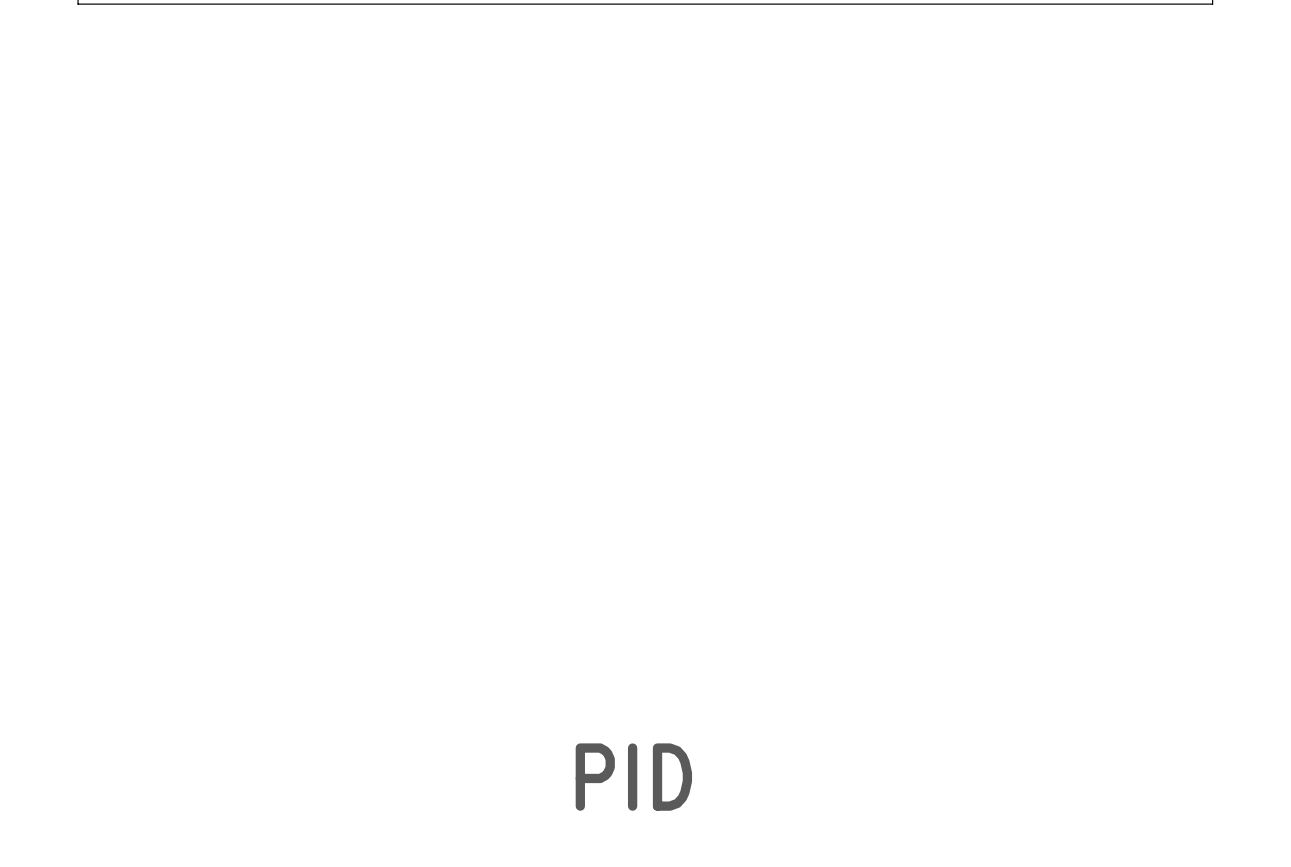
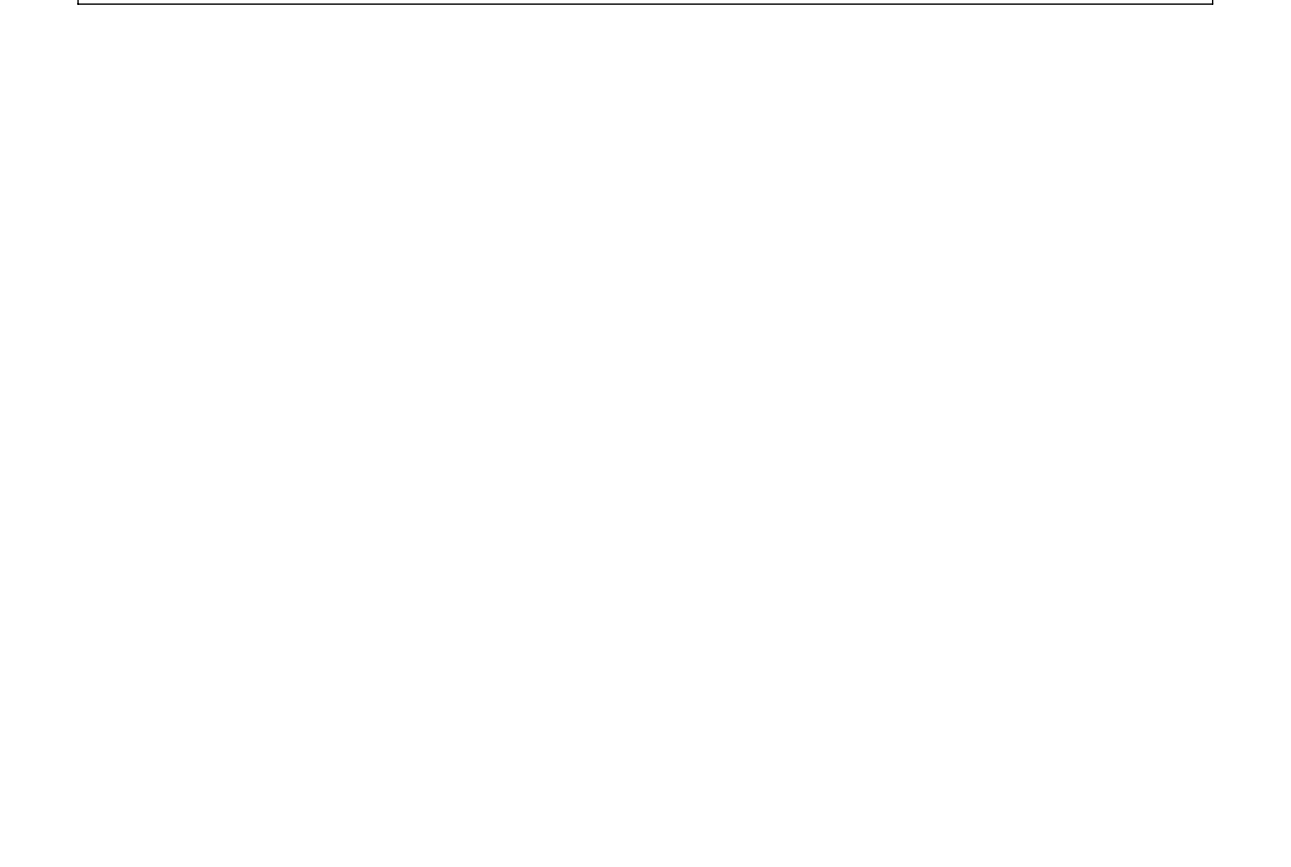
text: PID (633, 777) -> none

